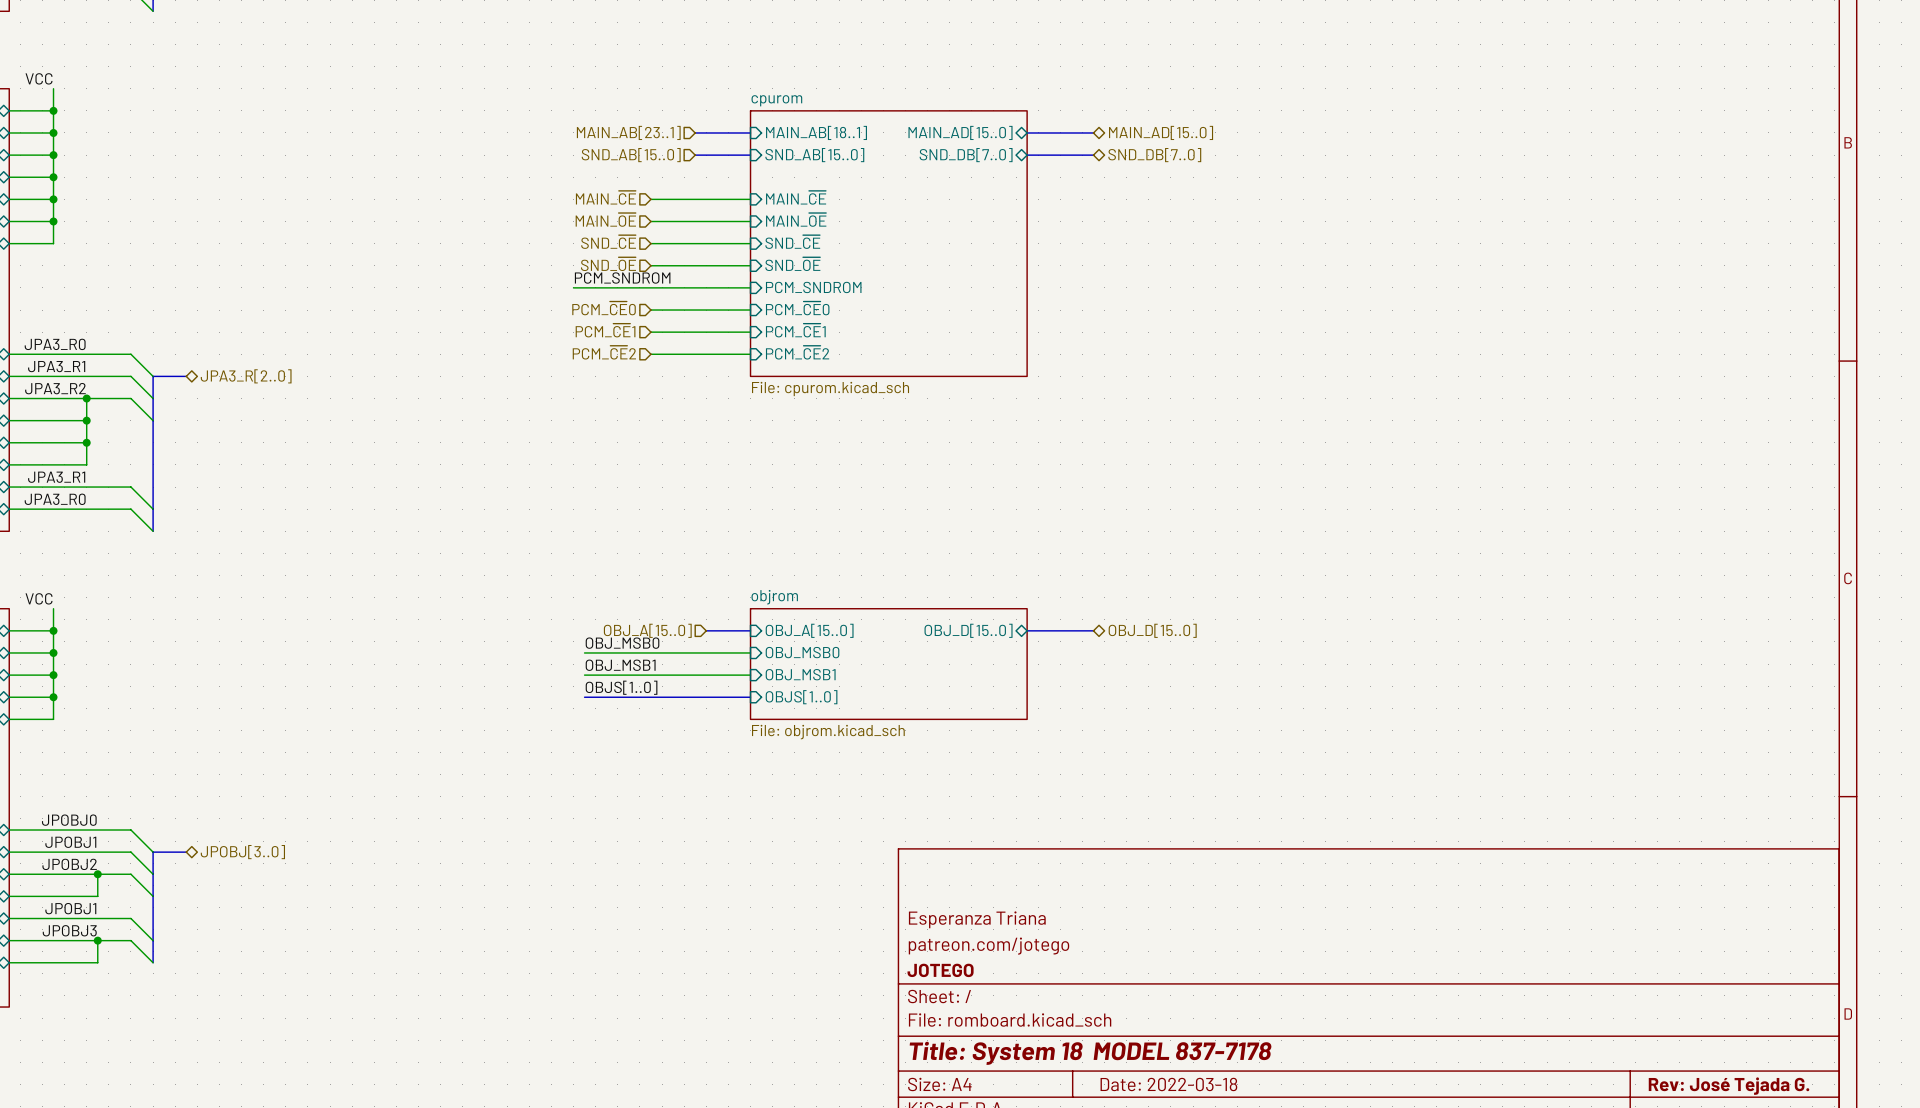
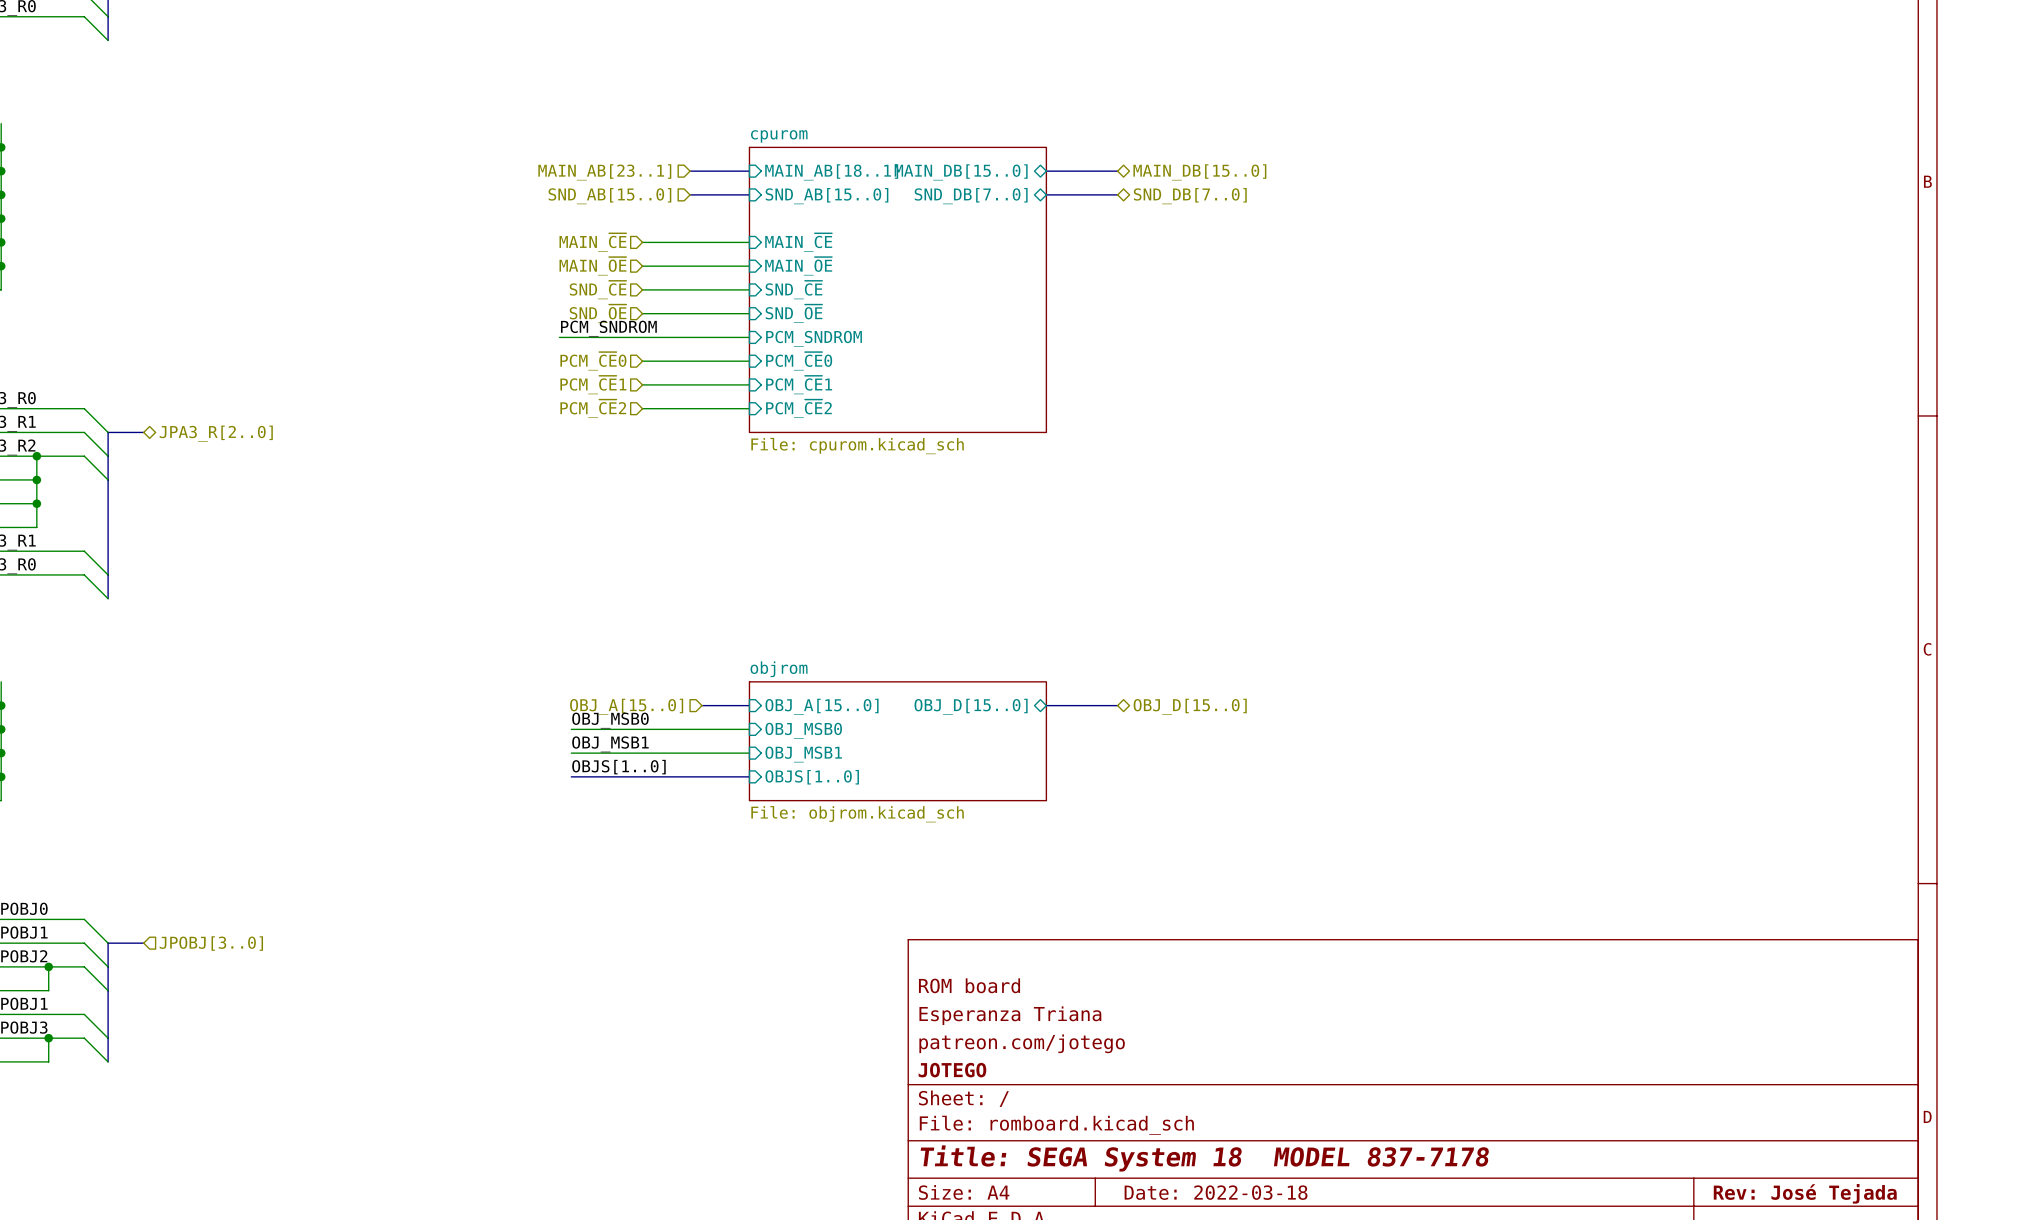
sheet pin: MAIN_AD[15..0] (960, 132) -> MAIN_DB[15..0] (961, 172)
hierarchical label: MAIN_AD[15..0] (1161, 132) -> MAIN_DB[15..0] (1199, 172)
hierarchical label shape: bidirectional (242, 852) -> input (211, 943)
title block: none -> ROM board (969, 985)
title block: Title: System 18 MODEL 837-7178 (1090, 1053) -> Title: SEGA System 18 MODEL 837-7178 (1204, 1158)
title block: Rev: José Tejada G. (1729, 1086) -> Rev: José Tejada (1805, 1193)

